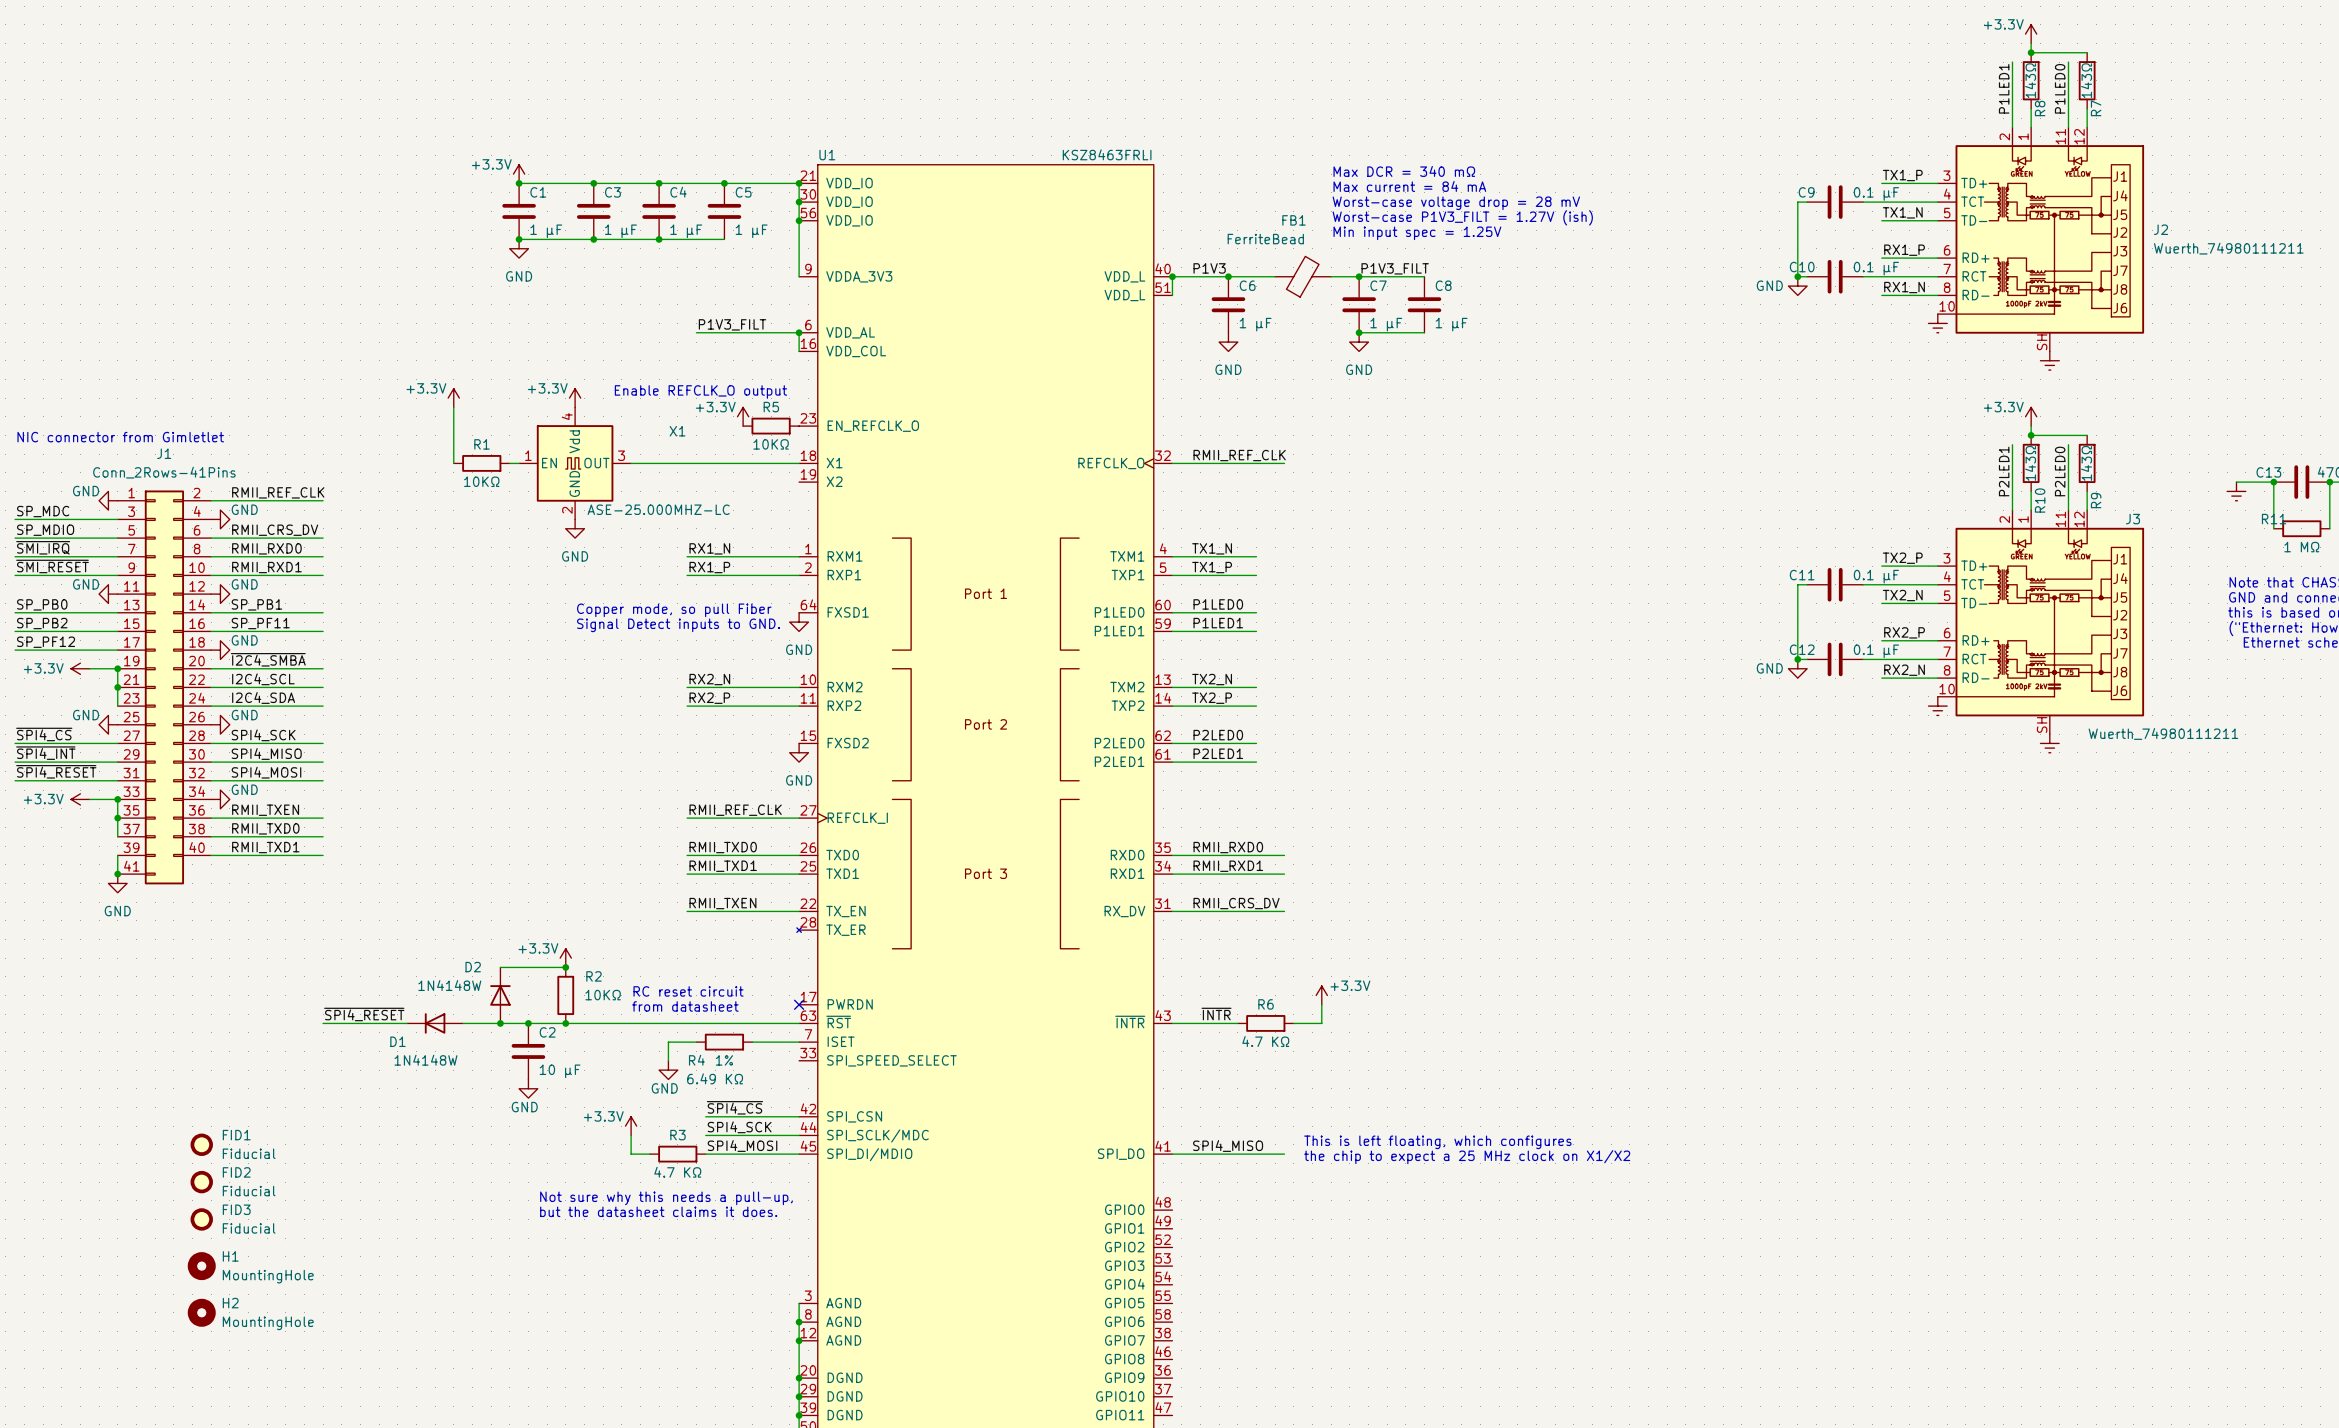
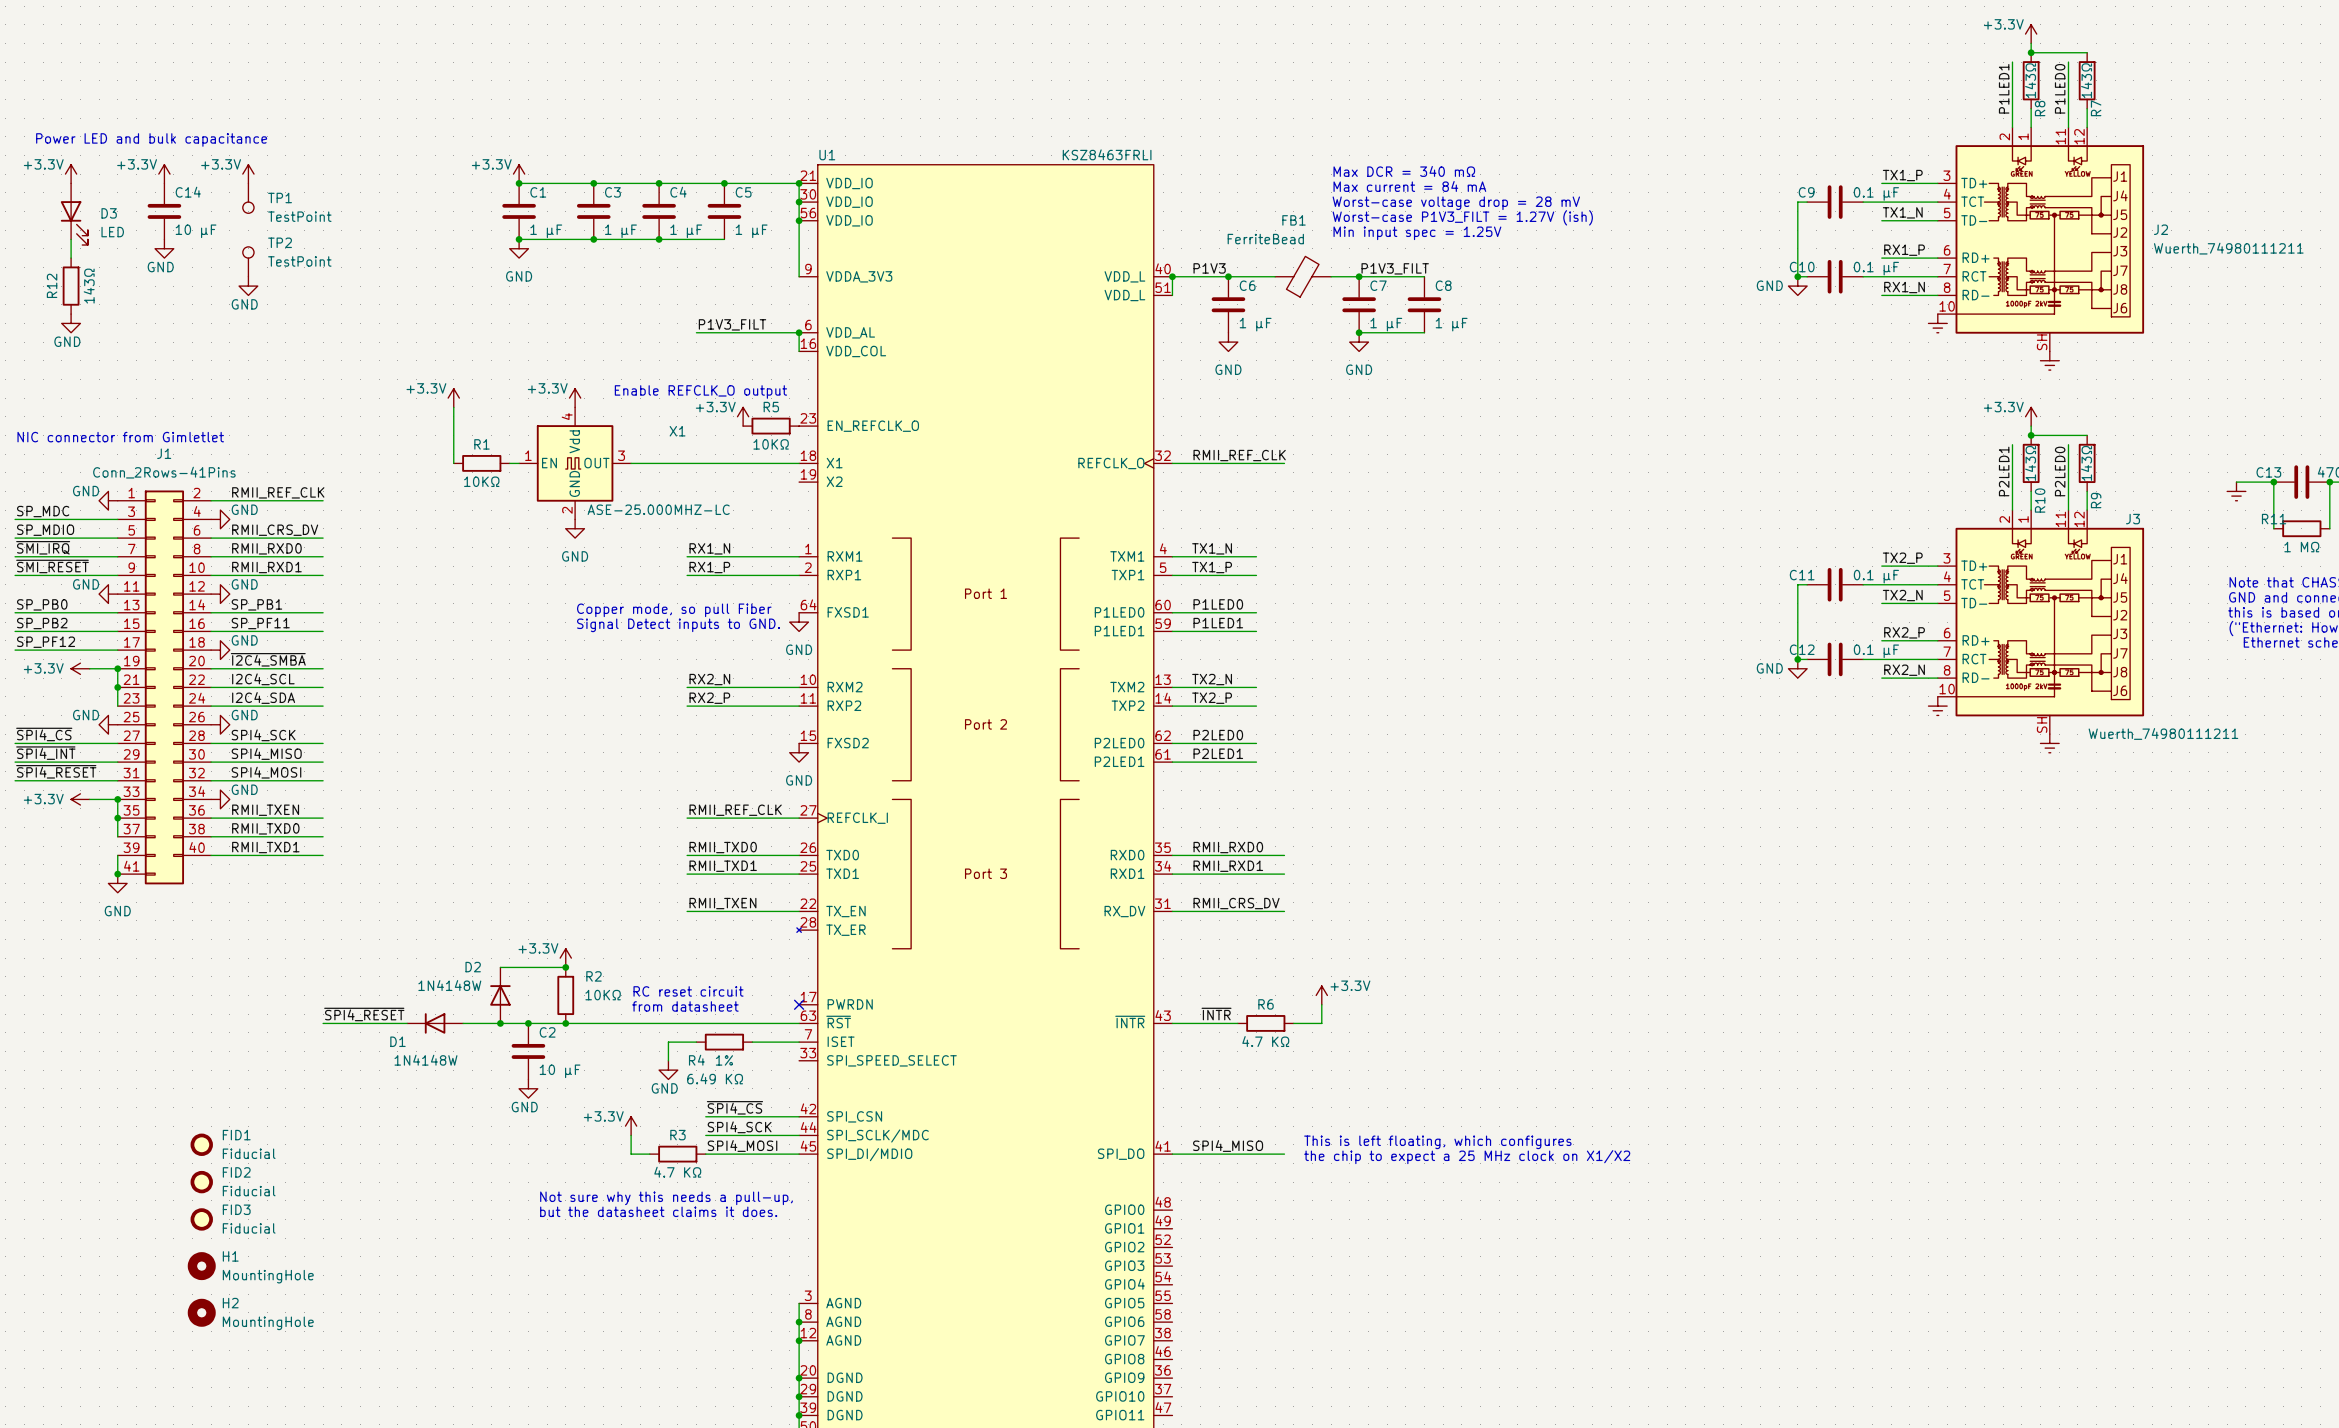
text: none -> Power LED and bulk capacitance (151, 139)
power symbol: none -> +3.3V (71, 174)
power symbol: none -> +3.3V (164, 174)
power symbol: none -> +3.3V (248, 174)
TP1: none -> TestPoint (248, 198)
C14: none -> 10 µF (164, 211)
D3: none -> LED (74, 214)
wire: none -> (71, 239) (71, 258)
power symbol: none -> GND (164, 248)
TP2: none -> TestPoint (248, 261)
R12: none -> 143Ω (71, 286)
power symbol: none -> GND (248, 286)
power symbol: none -> GND (71, 323)

